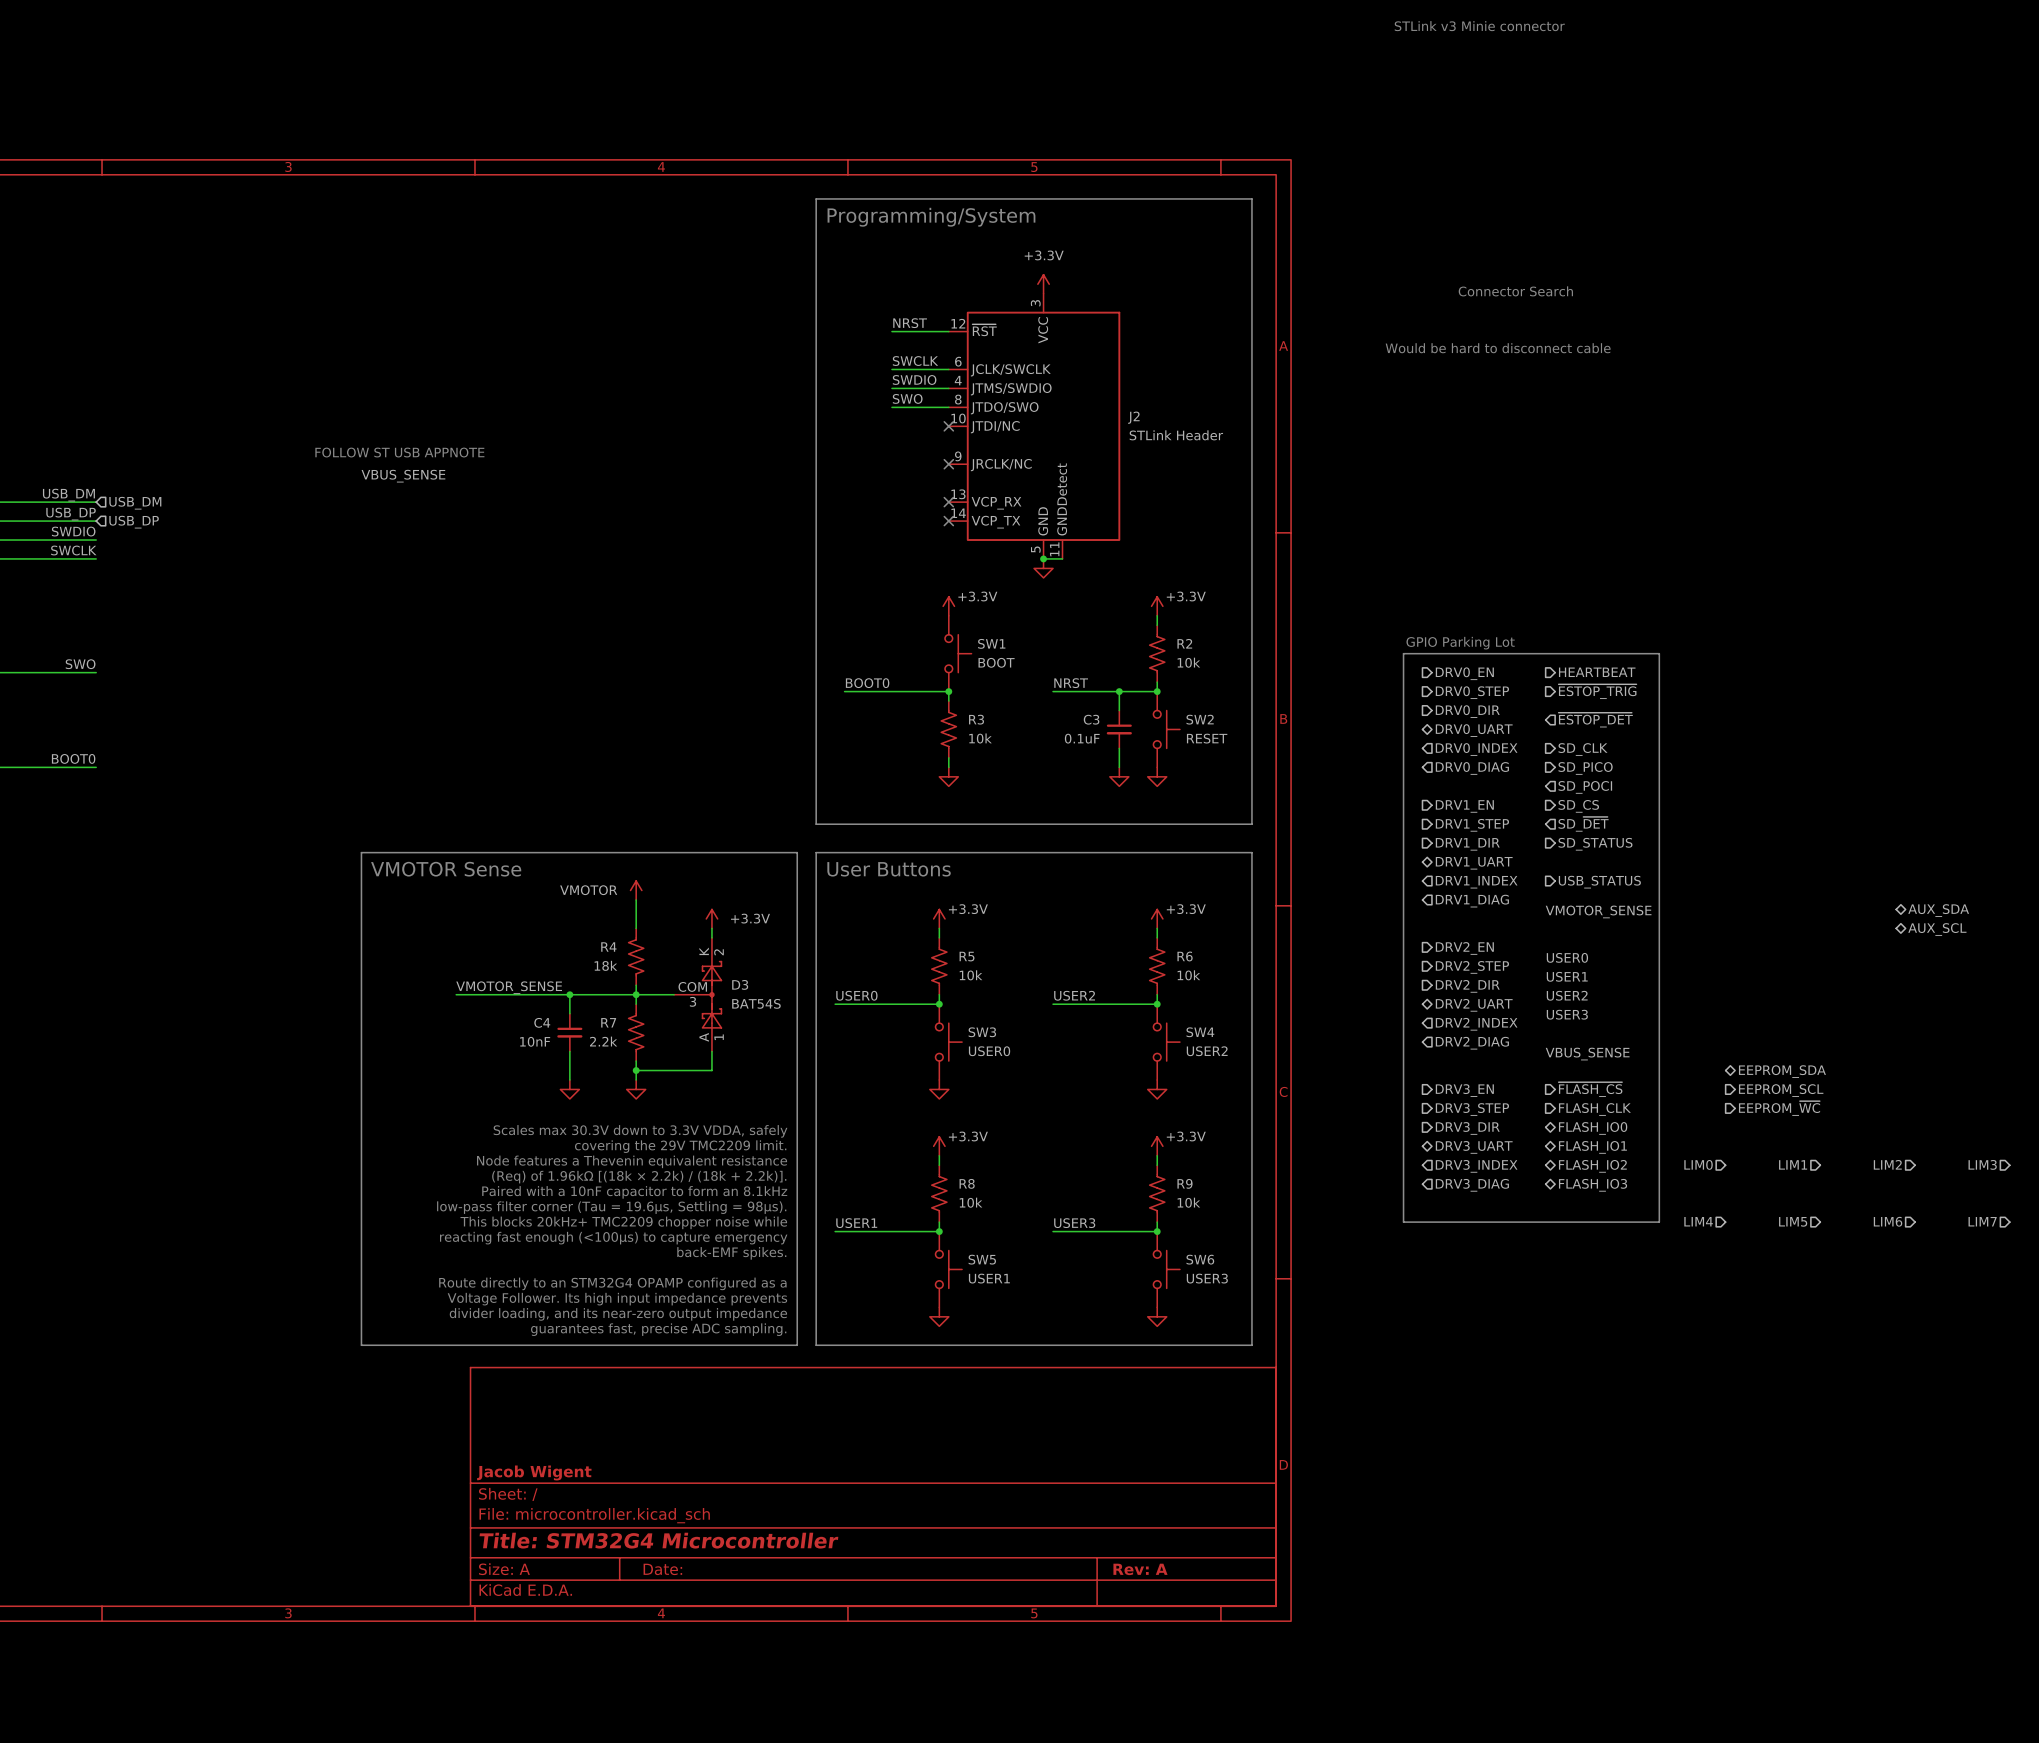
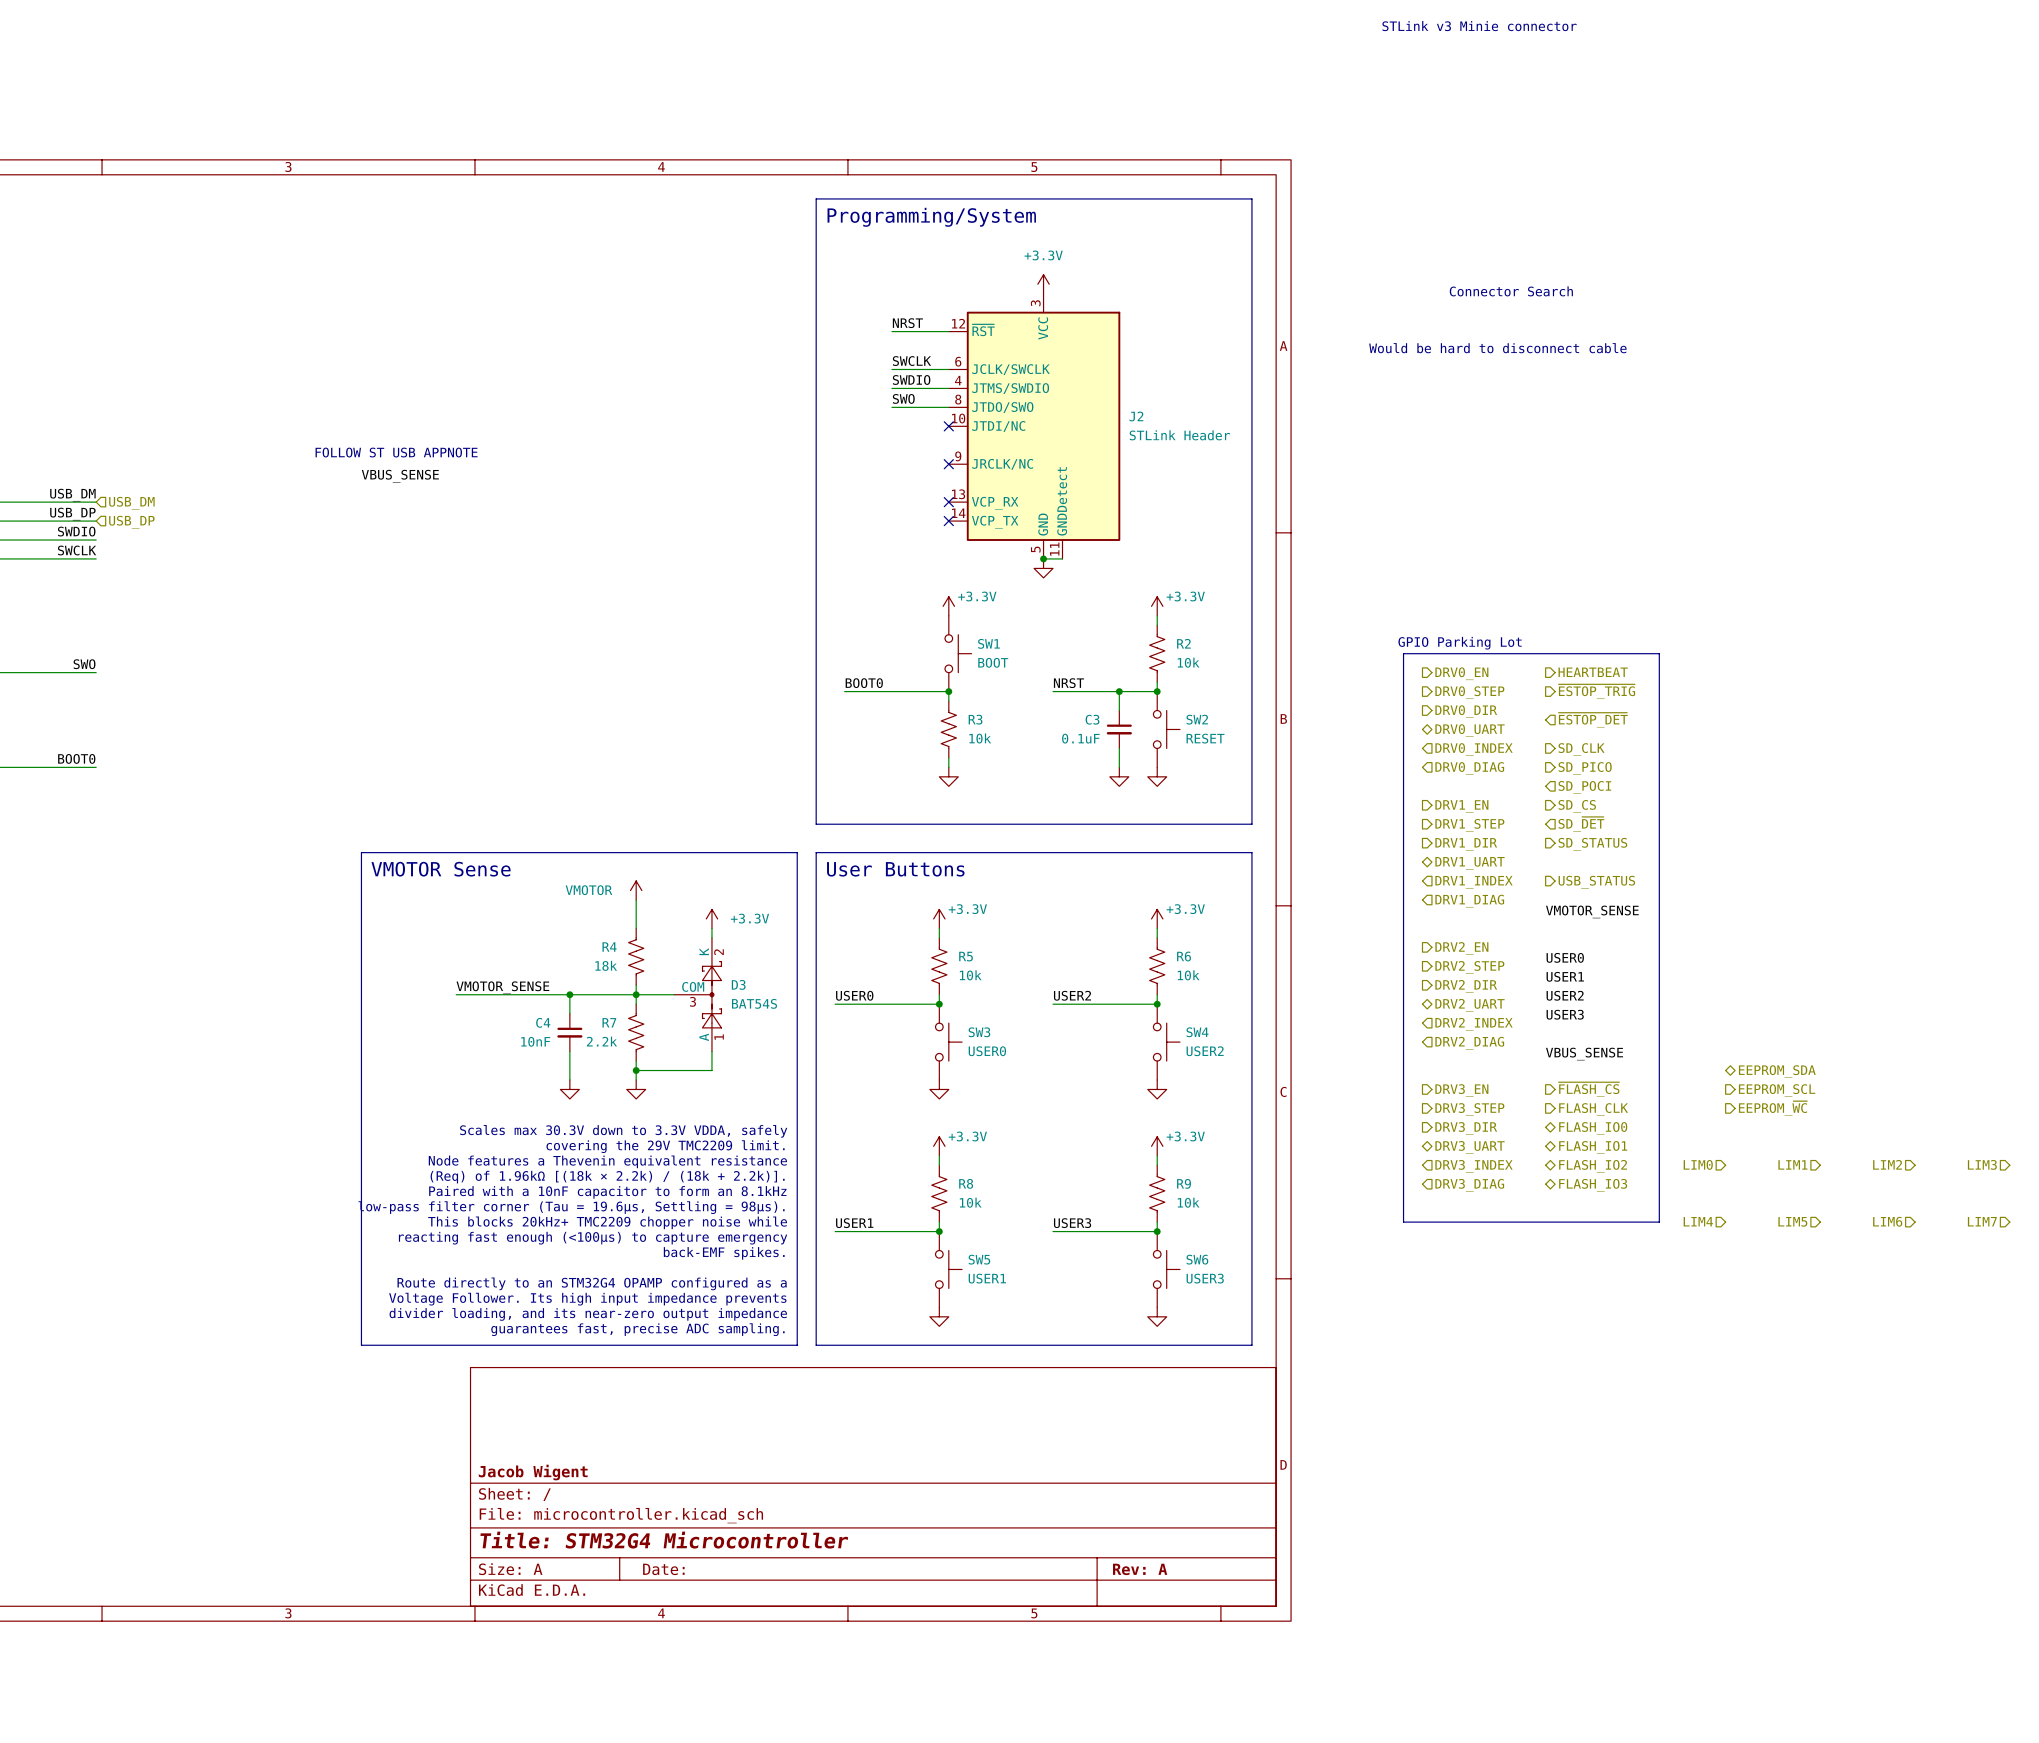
hierarchical label: AUX_SDA (1938, 910) -> none
hierarchical label: AUX_SCL (1937, 929) -> none

